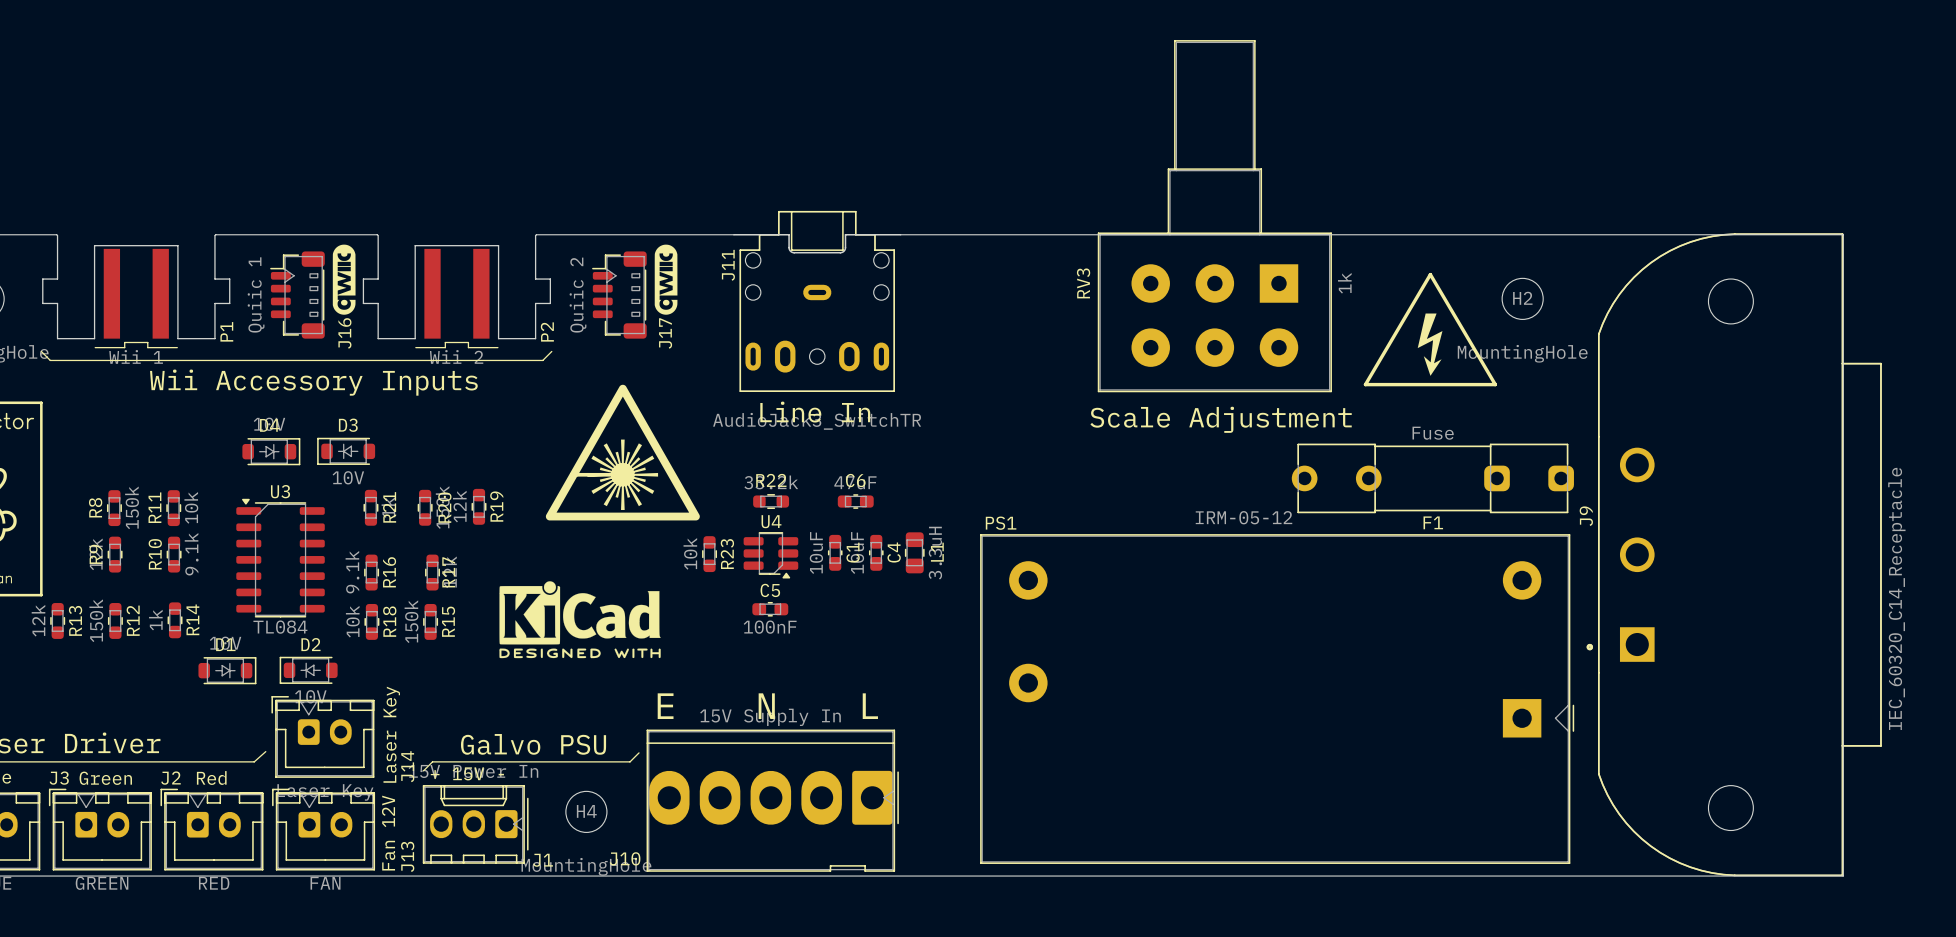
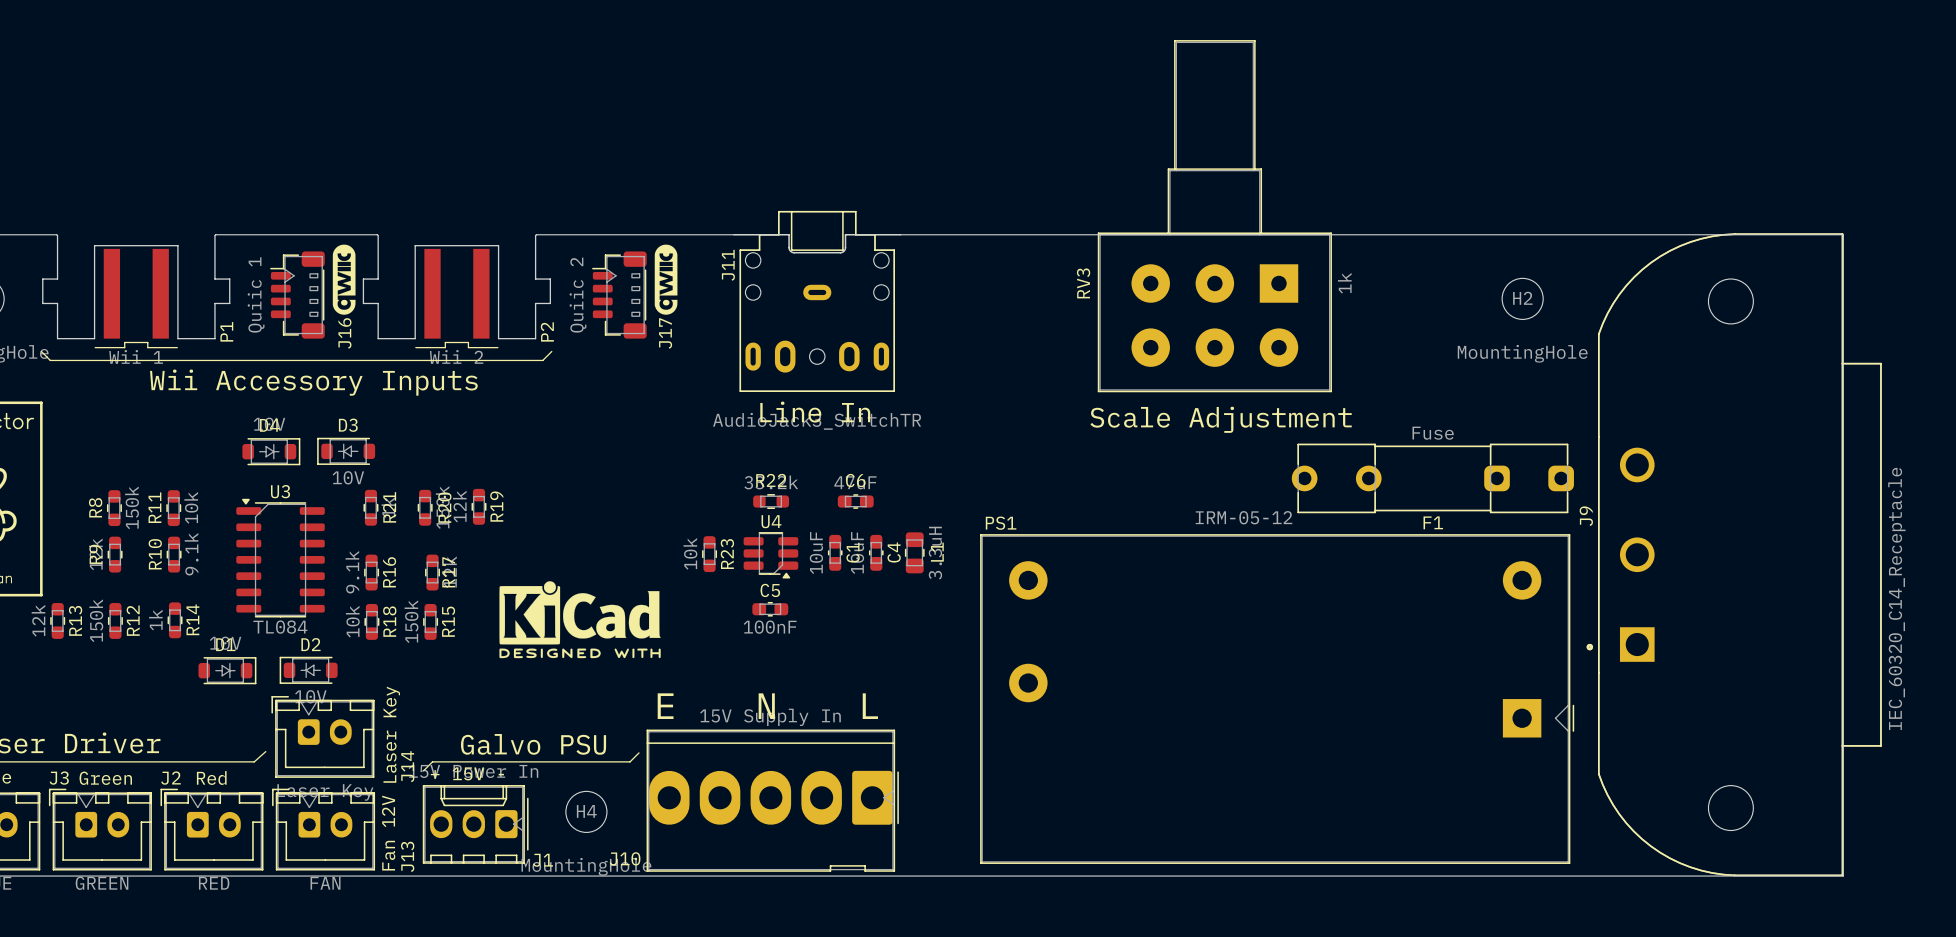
line: (1430, 274) (1365, 384) (1495, 384) (1430, 274) -> none
drawing: [1417, 313, 1443, 376] -> none
drawing: [545, 384, 700, 521] -> none

